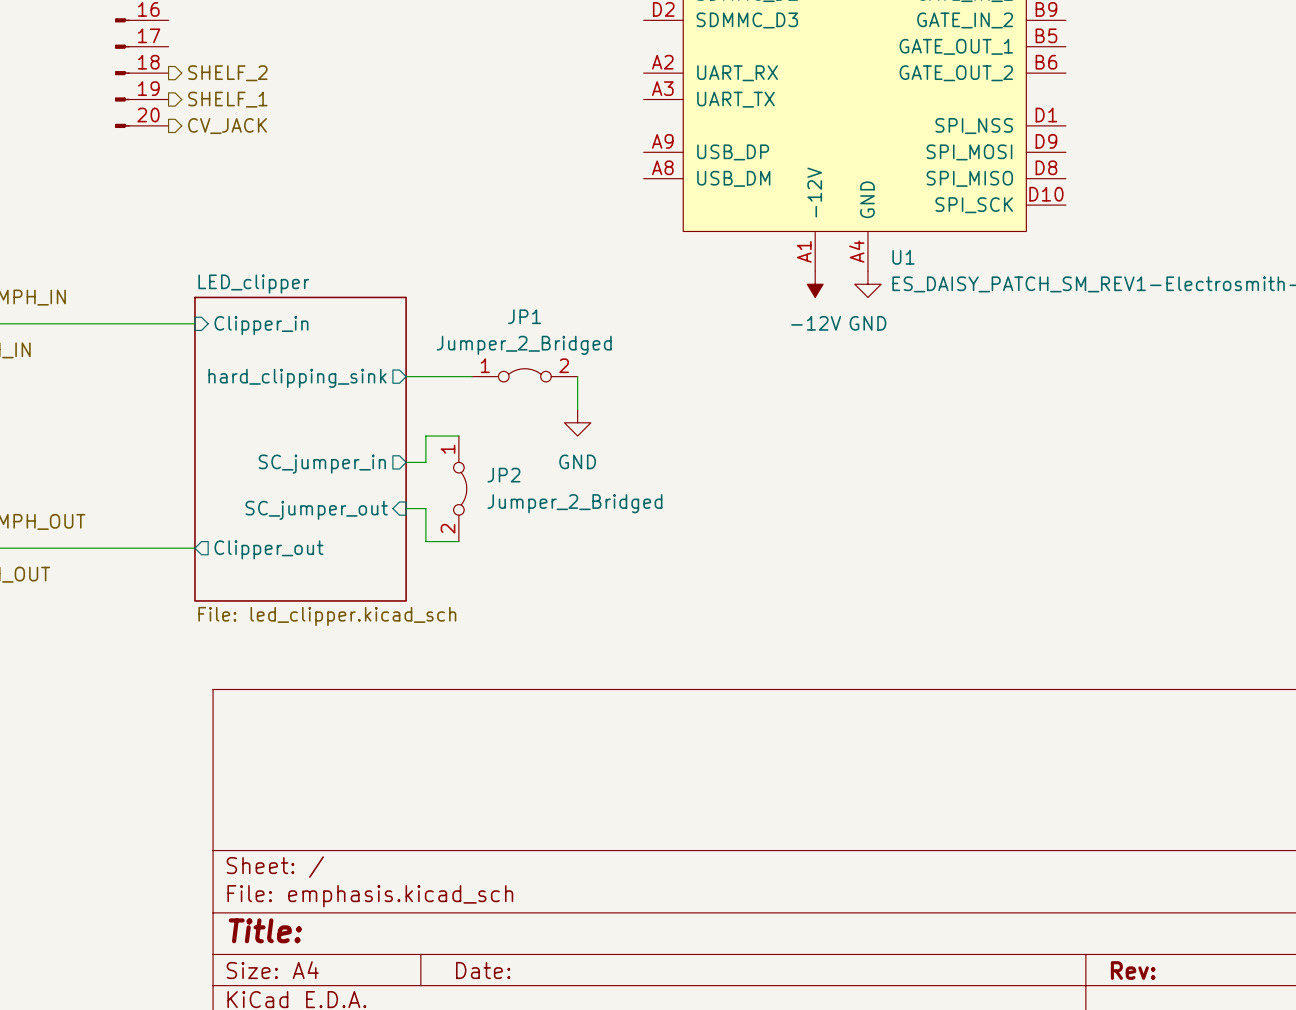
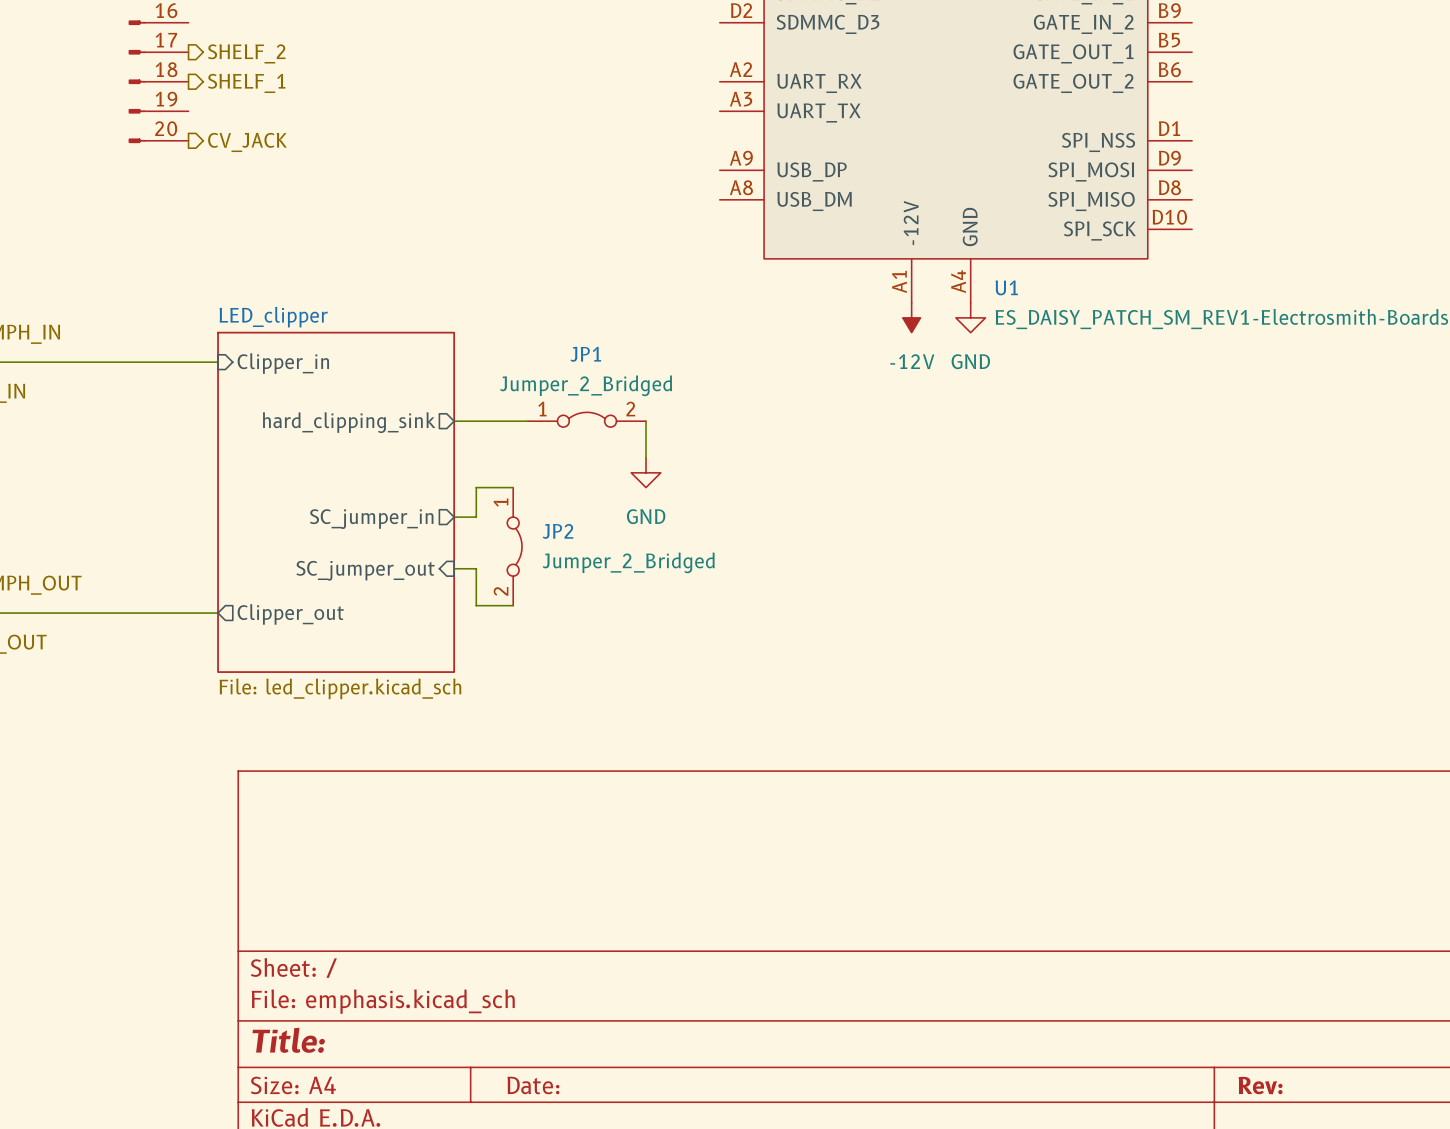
hierarchical label: none -> SHELF_2 (246, 53)
hierarchical label: SHELF_2 (227, 73) -> SHELF_1 (246, 83)
hierarchical label: SHELF_1 (227, 99) -> none

